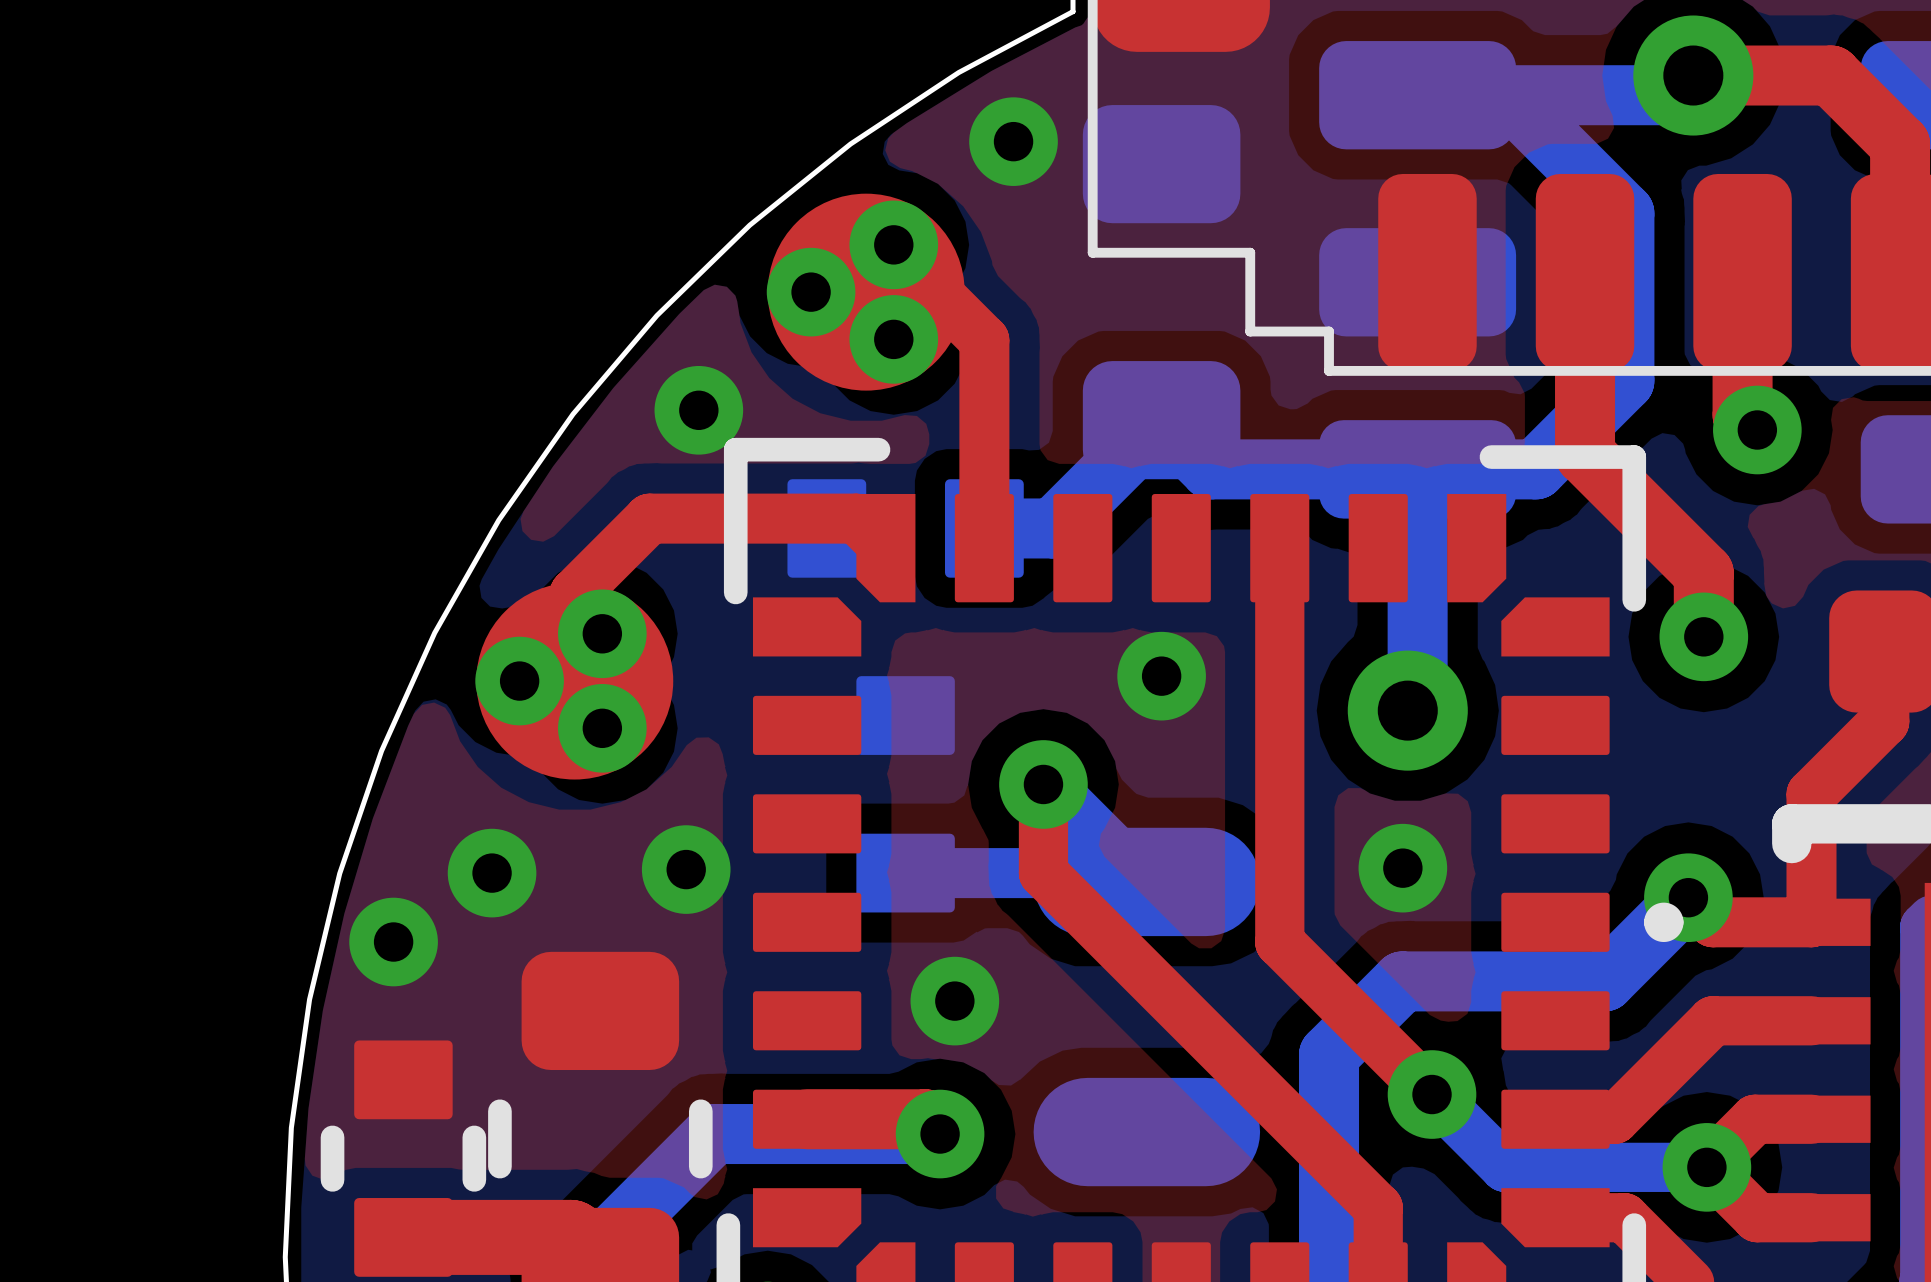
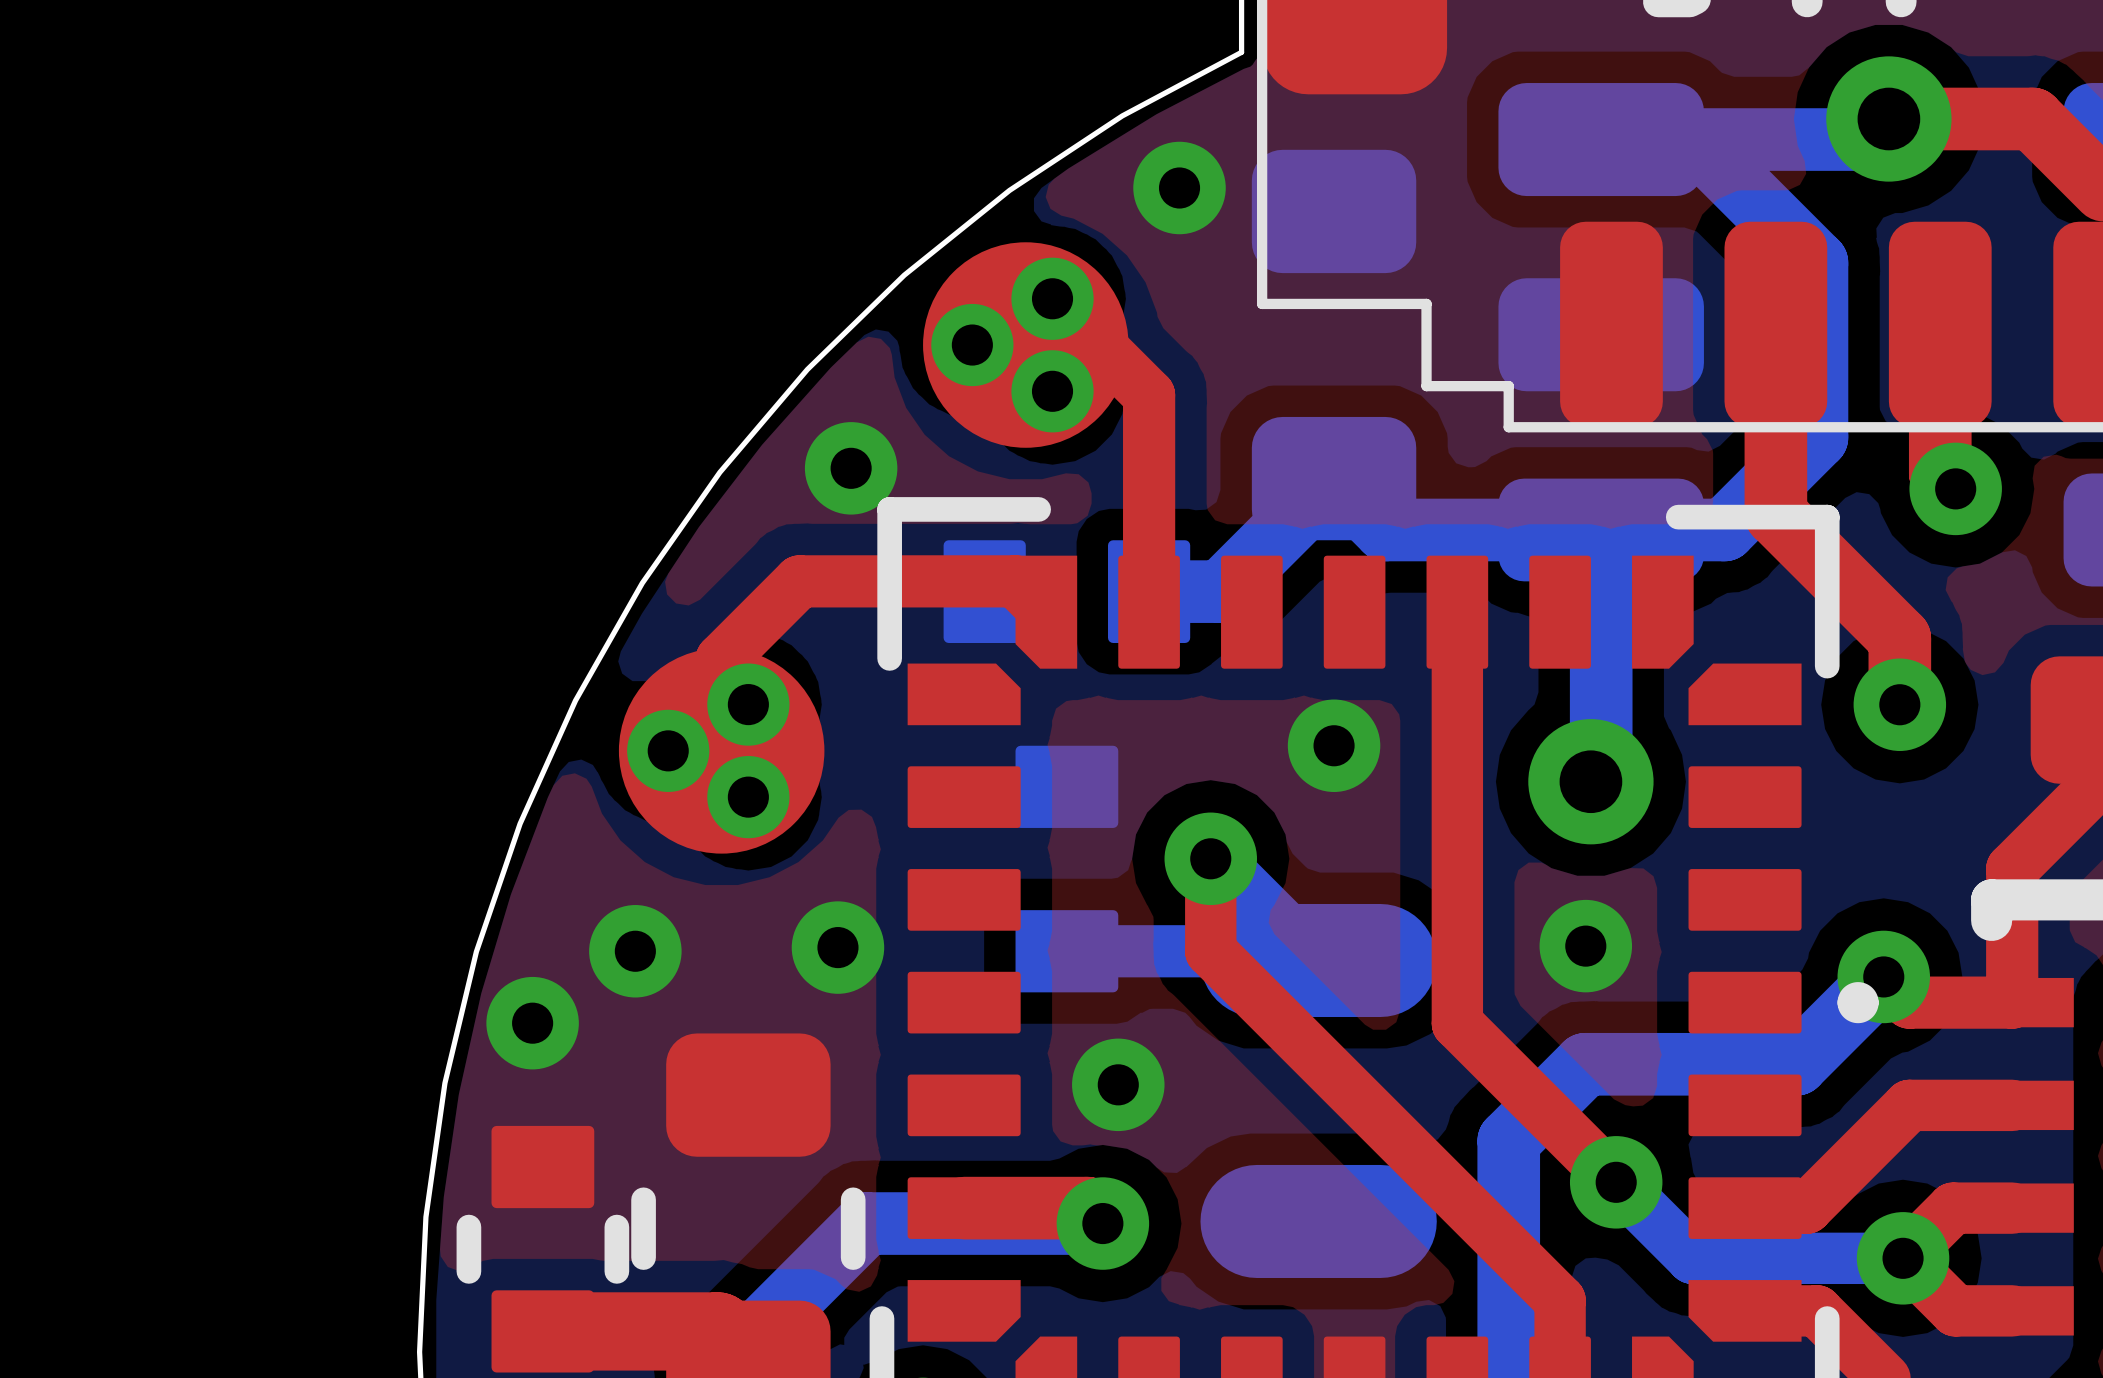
part footprint: [766, 193, 965, 391] -> [923, 242, 1129, 448]
part footprint: [475, 582, 674, 780] -> [618, 648, 825, 854]

